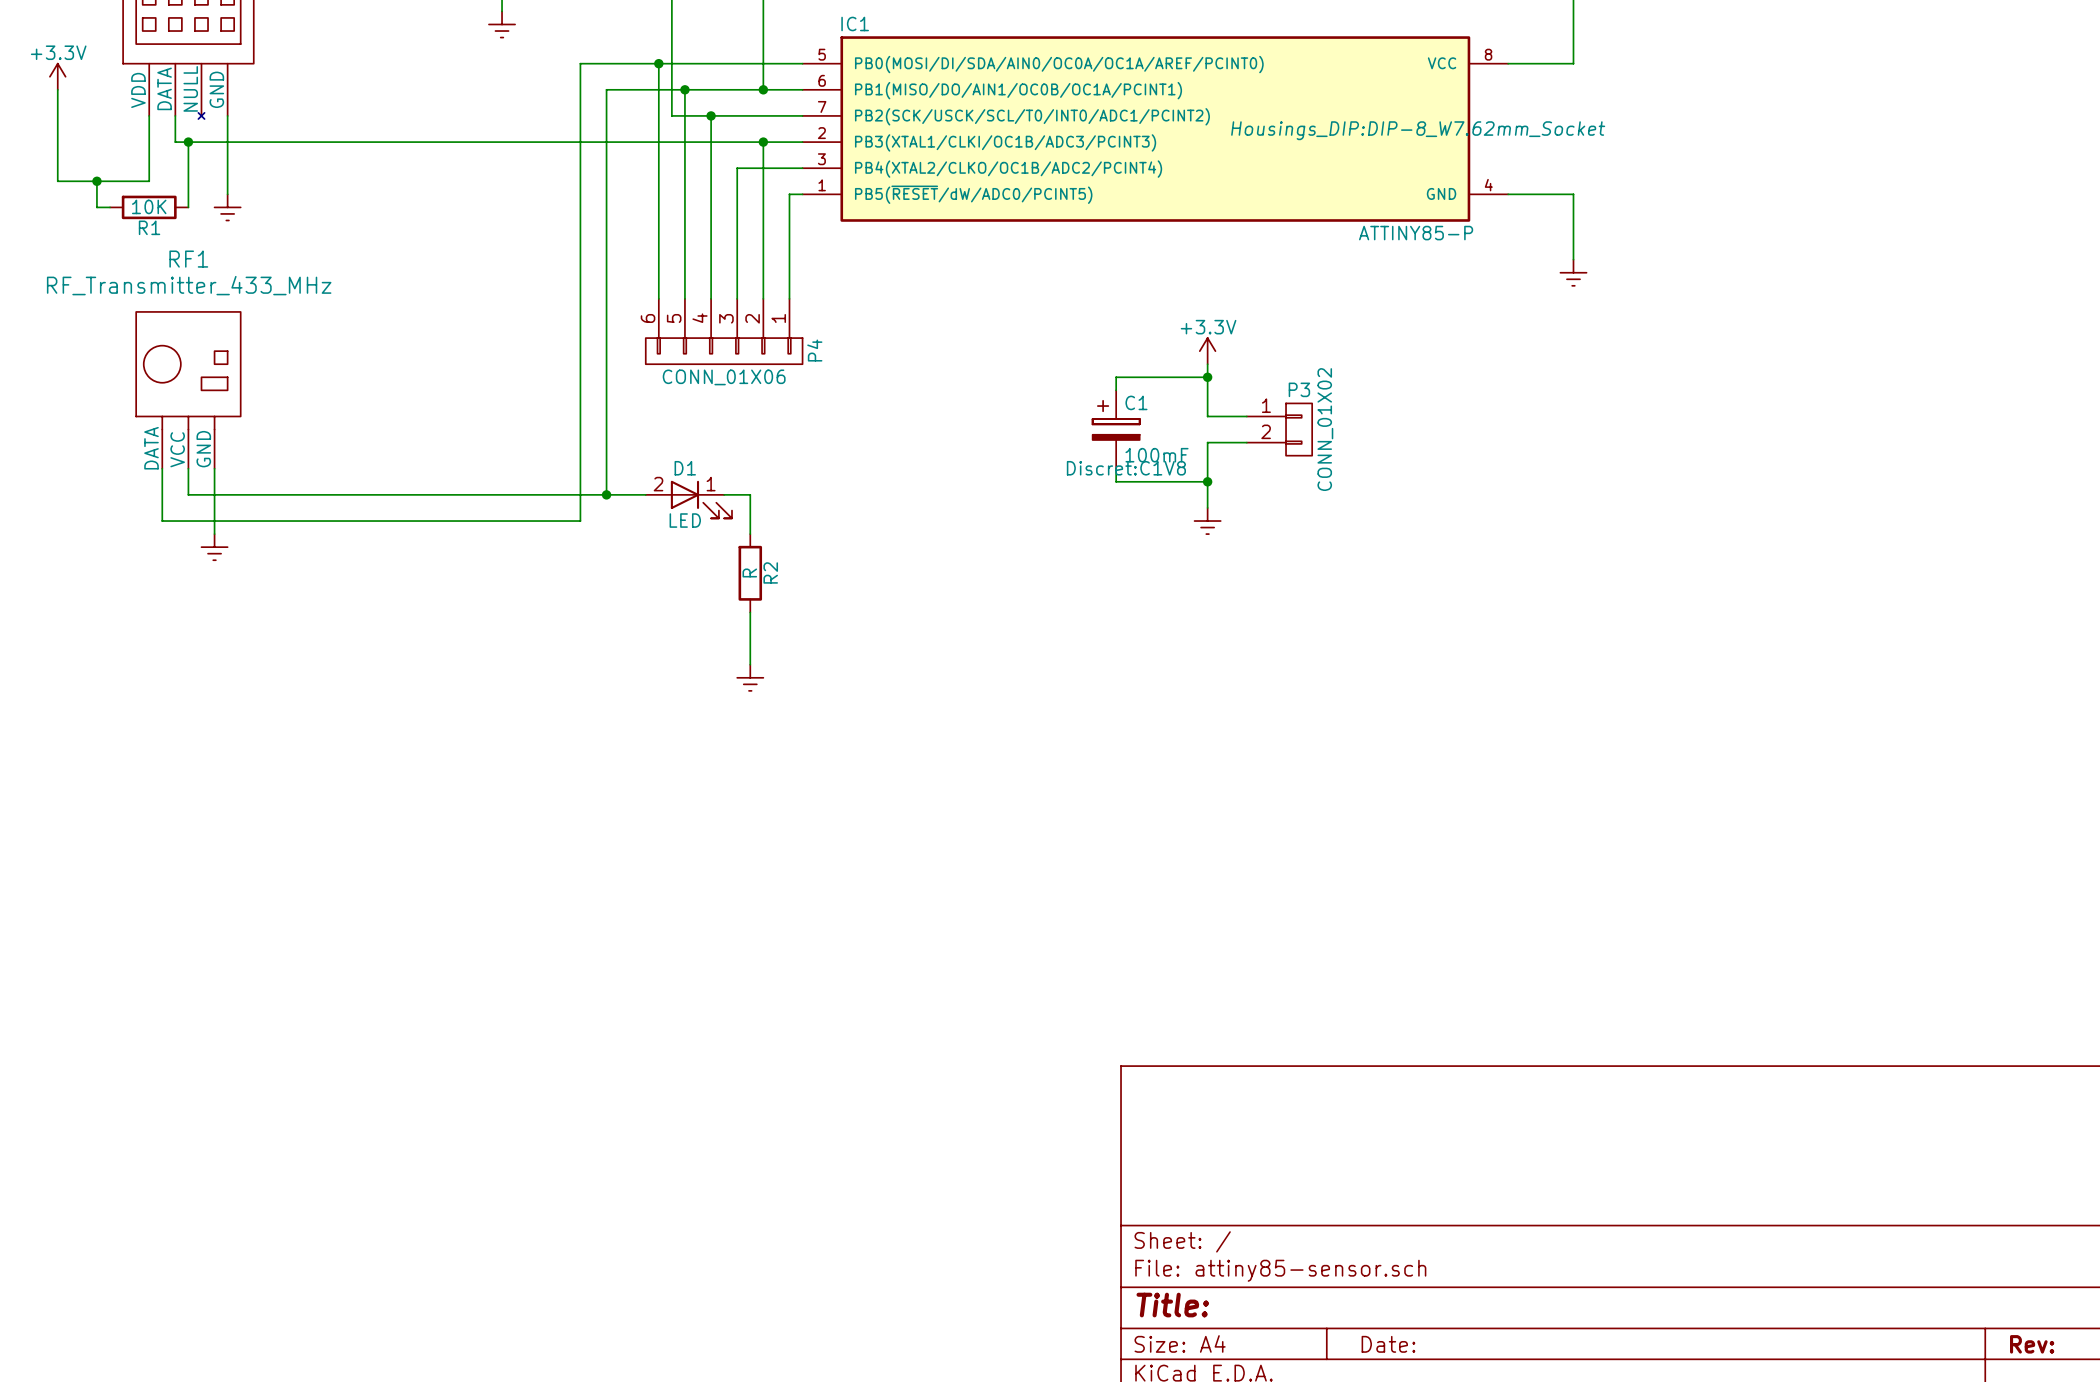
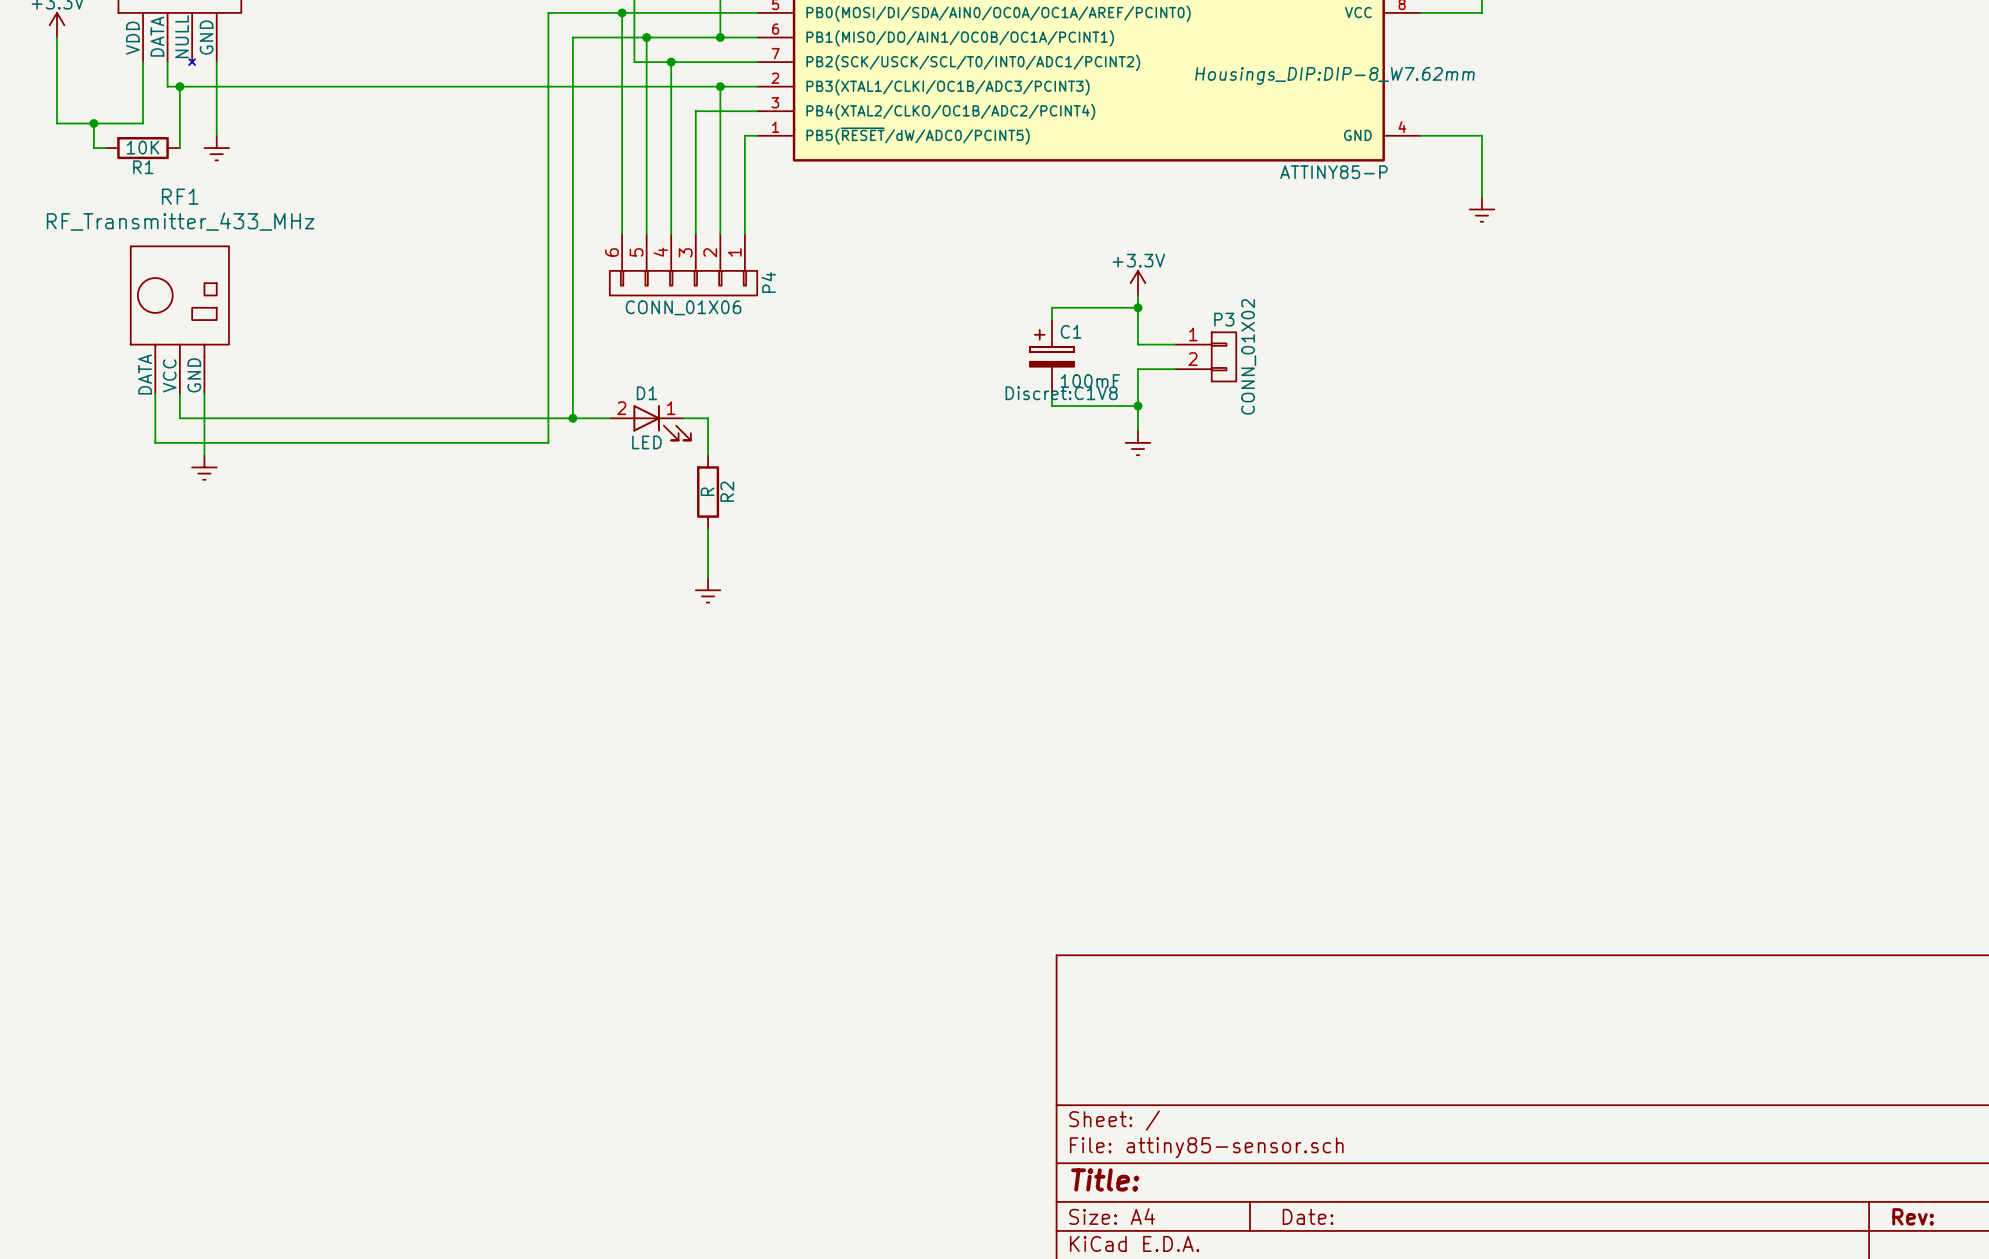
IC1 text: Housings_DIP:DIP-8_W7.62mm_Socket (1418, 130) -> Housings_DIP:DIP-8_W7.62mm (1334, 75)

